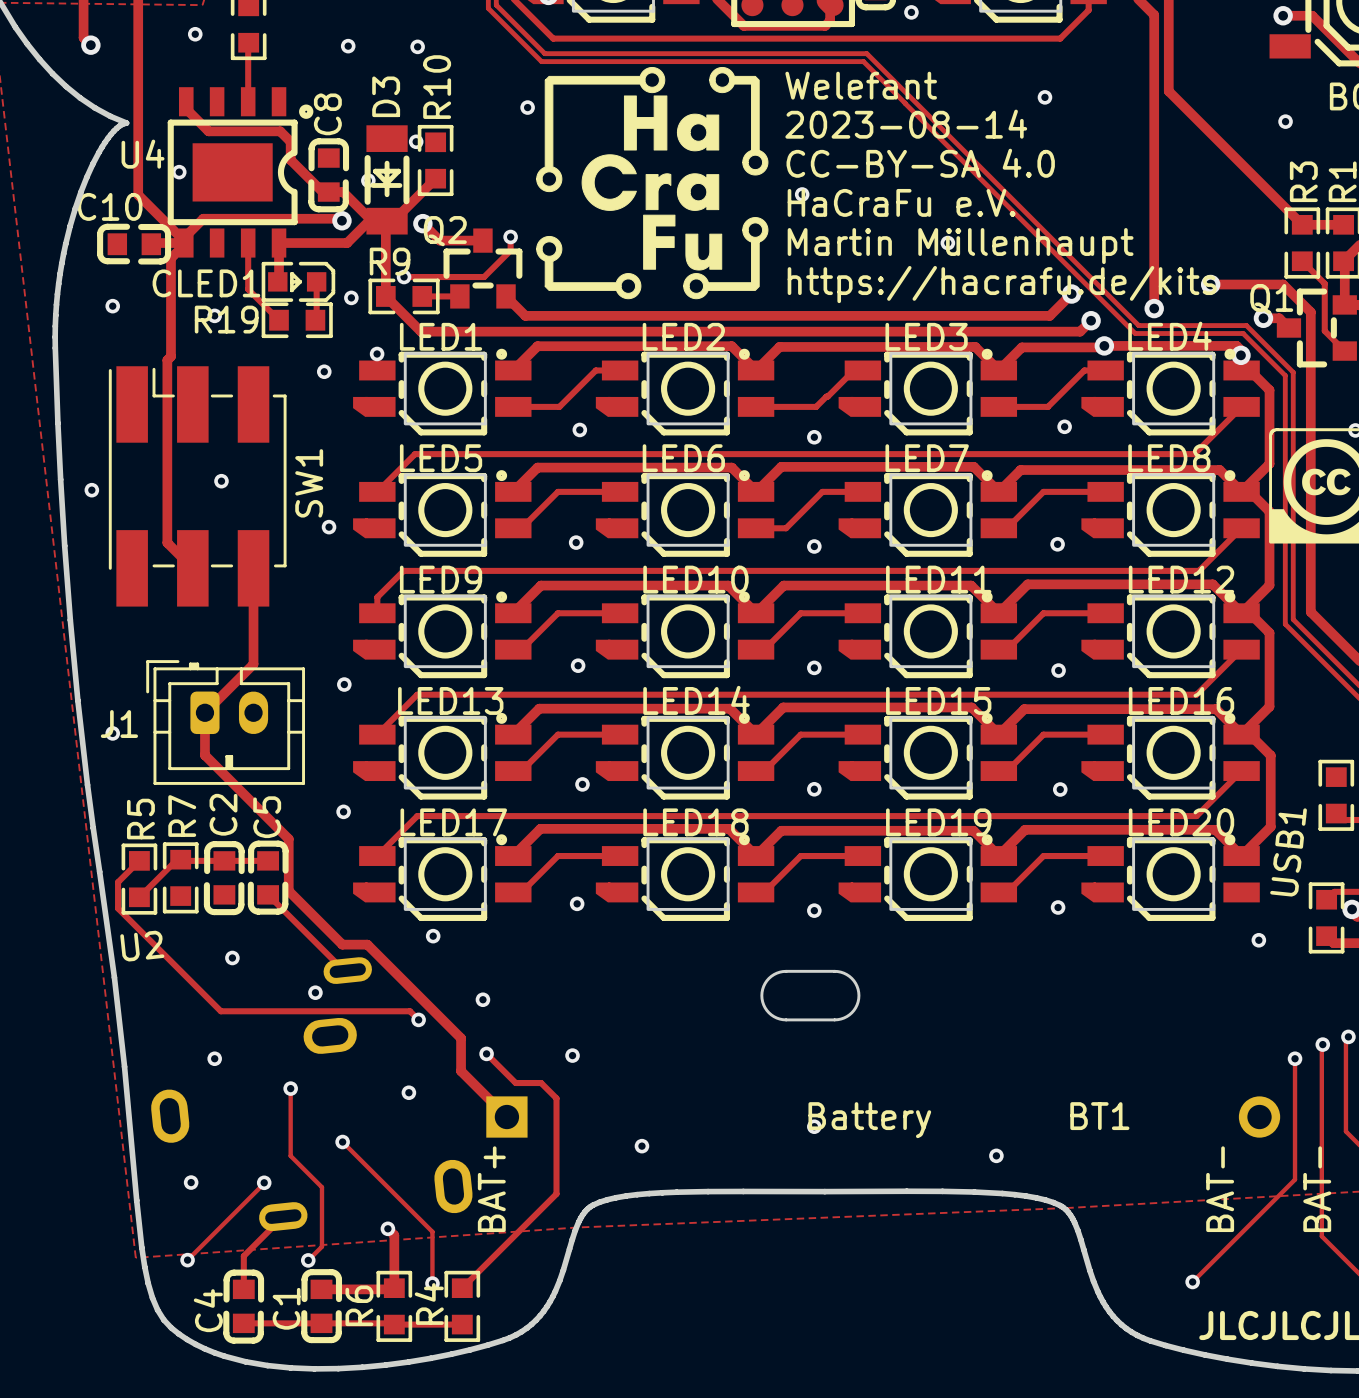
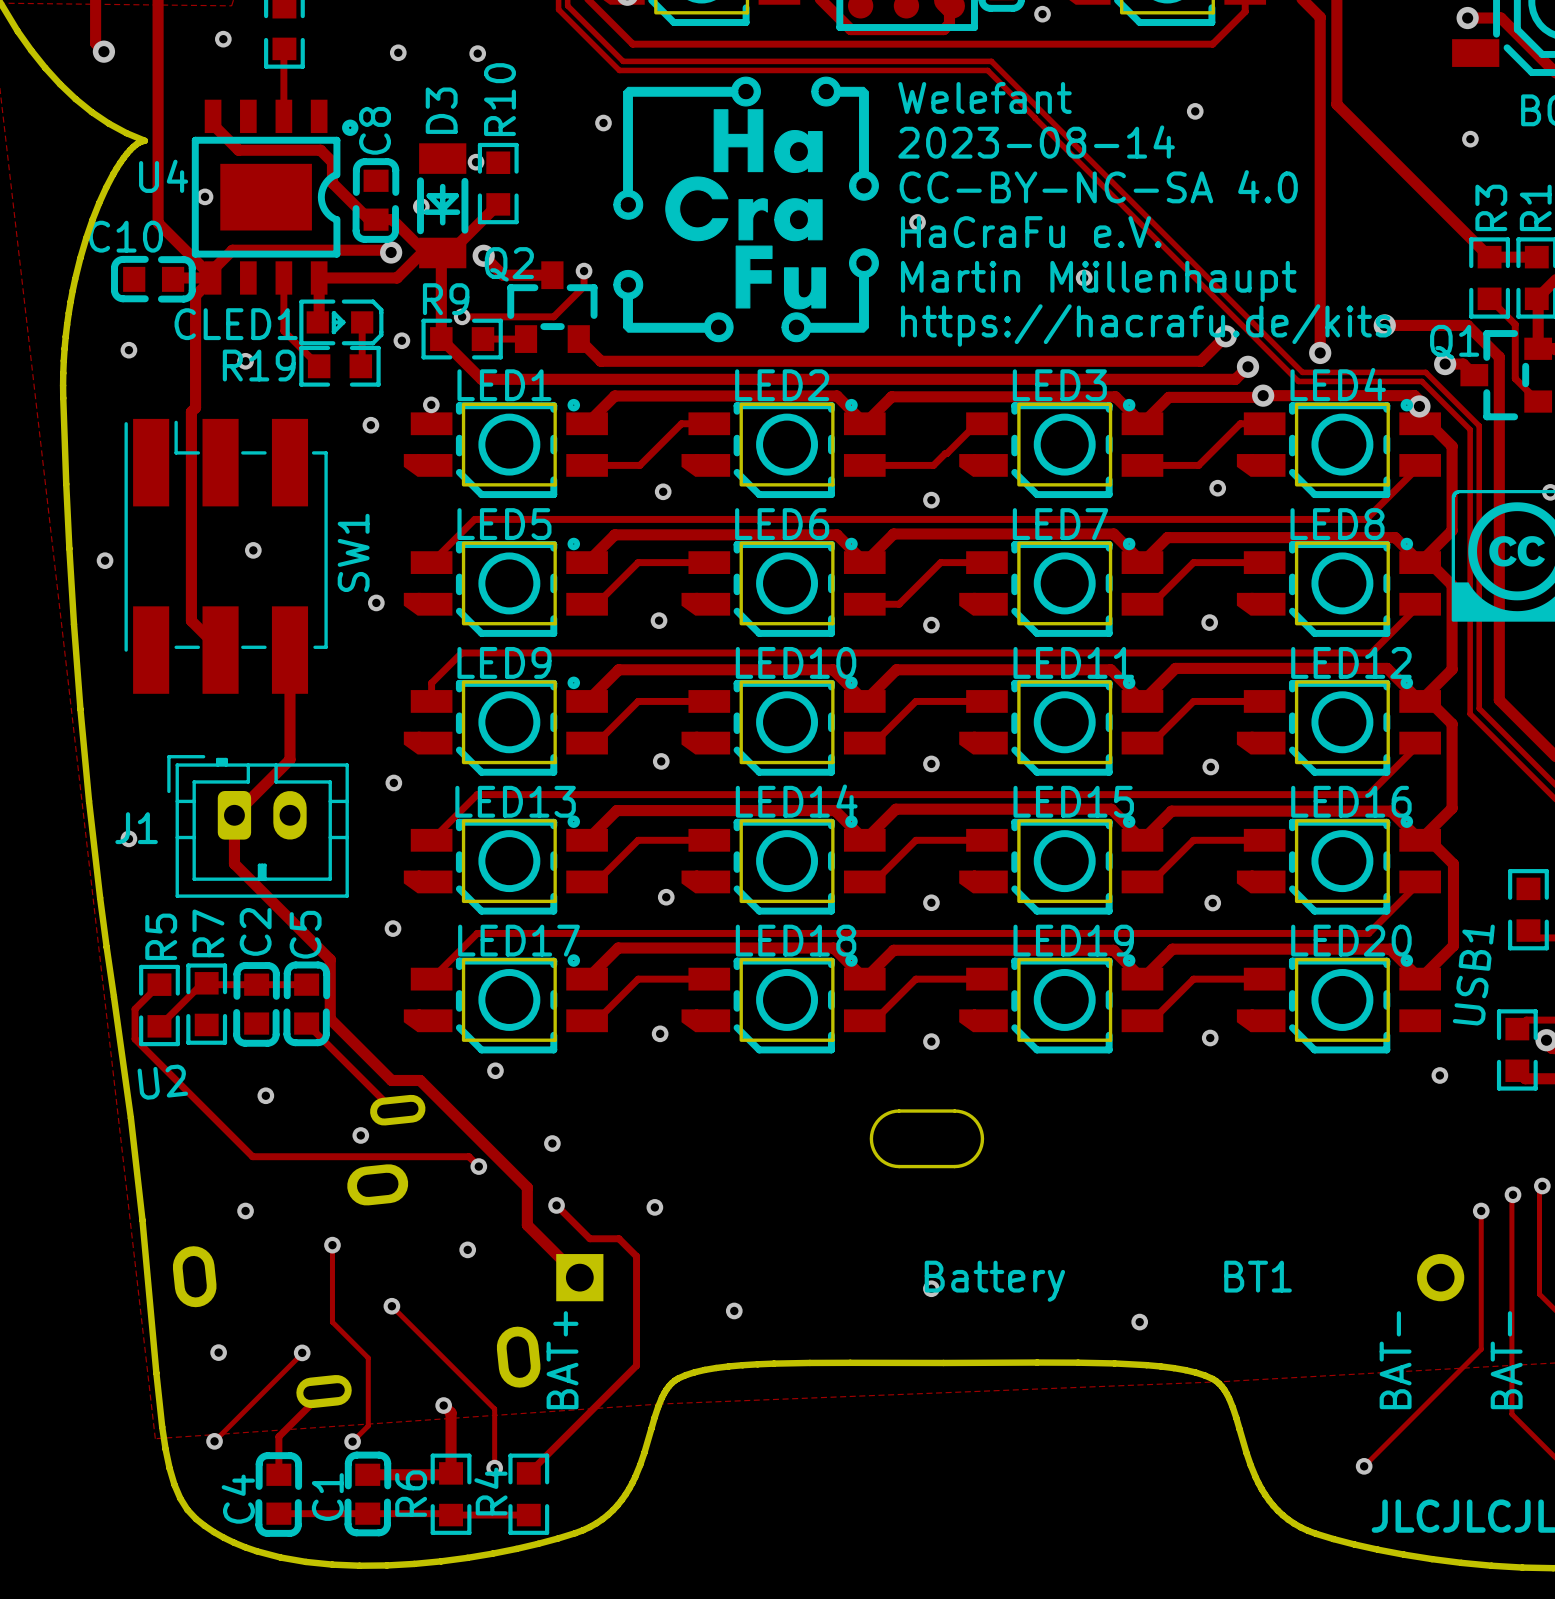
text: CC-BY-SA 4.0 (920, 163) -> CC-BY-NC-SA 4.0 (1098, 186)

